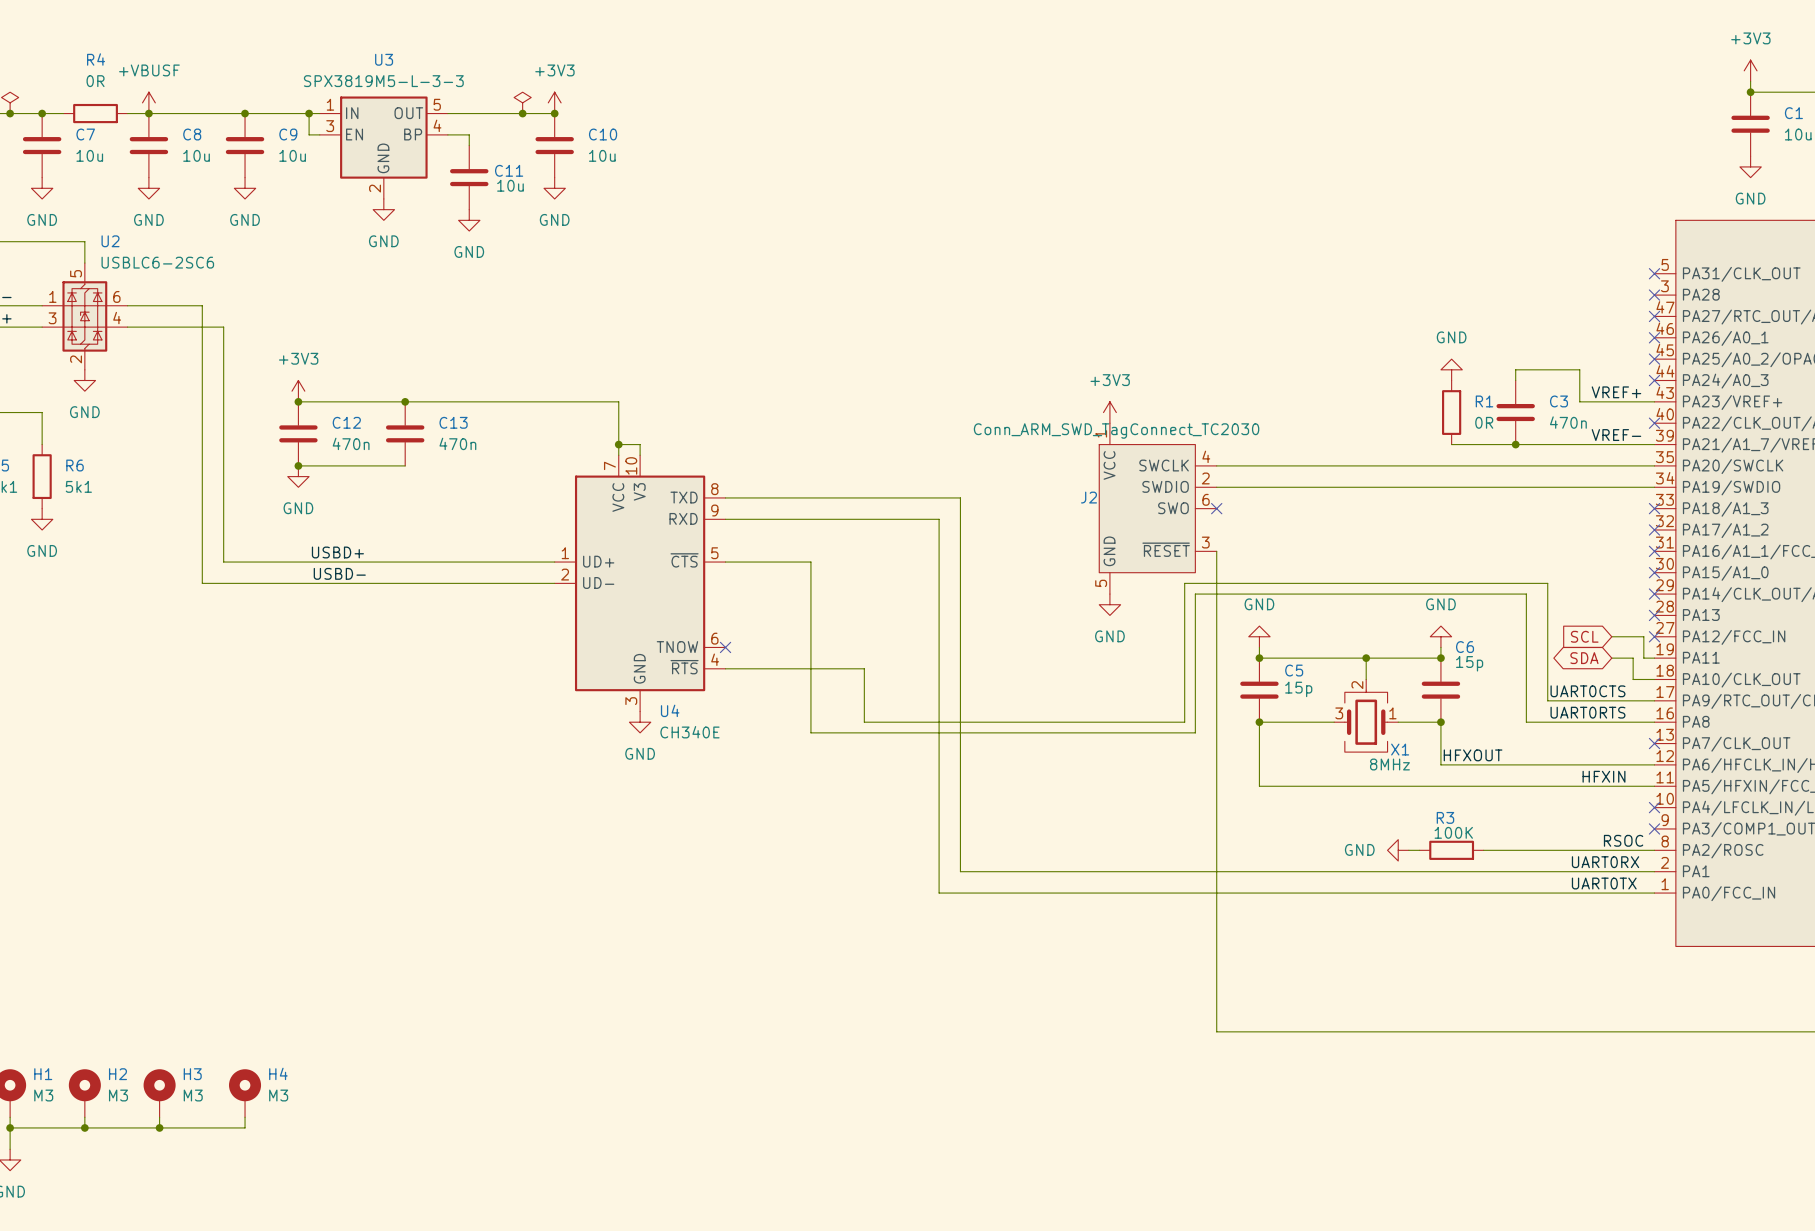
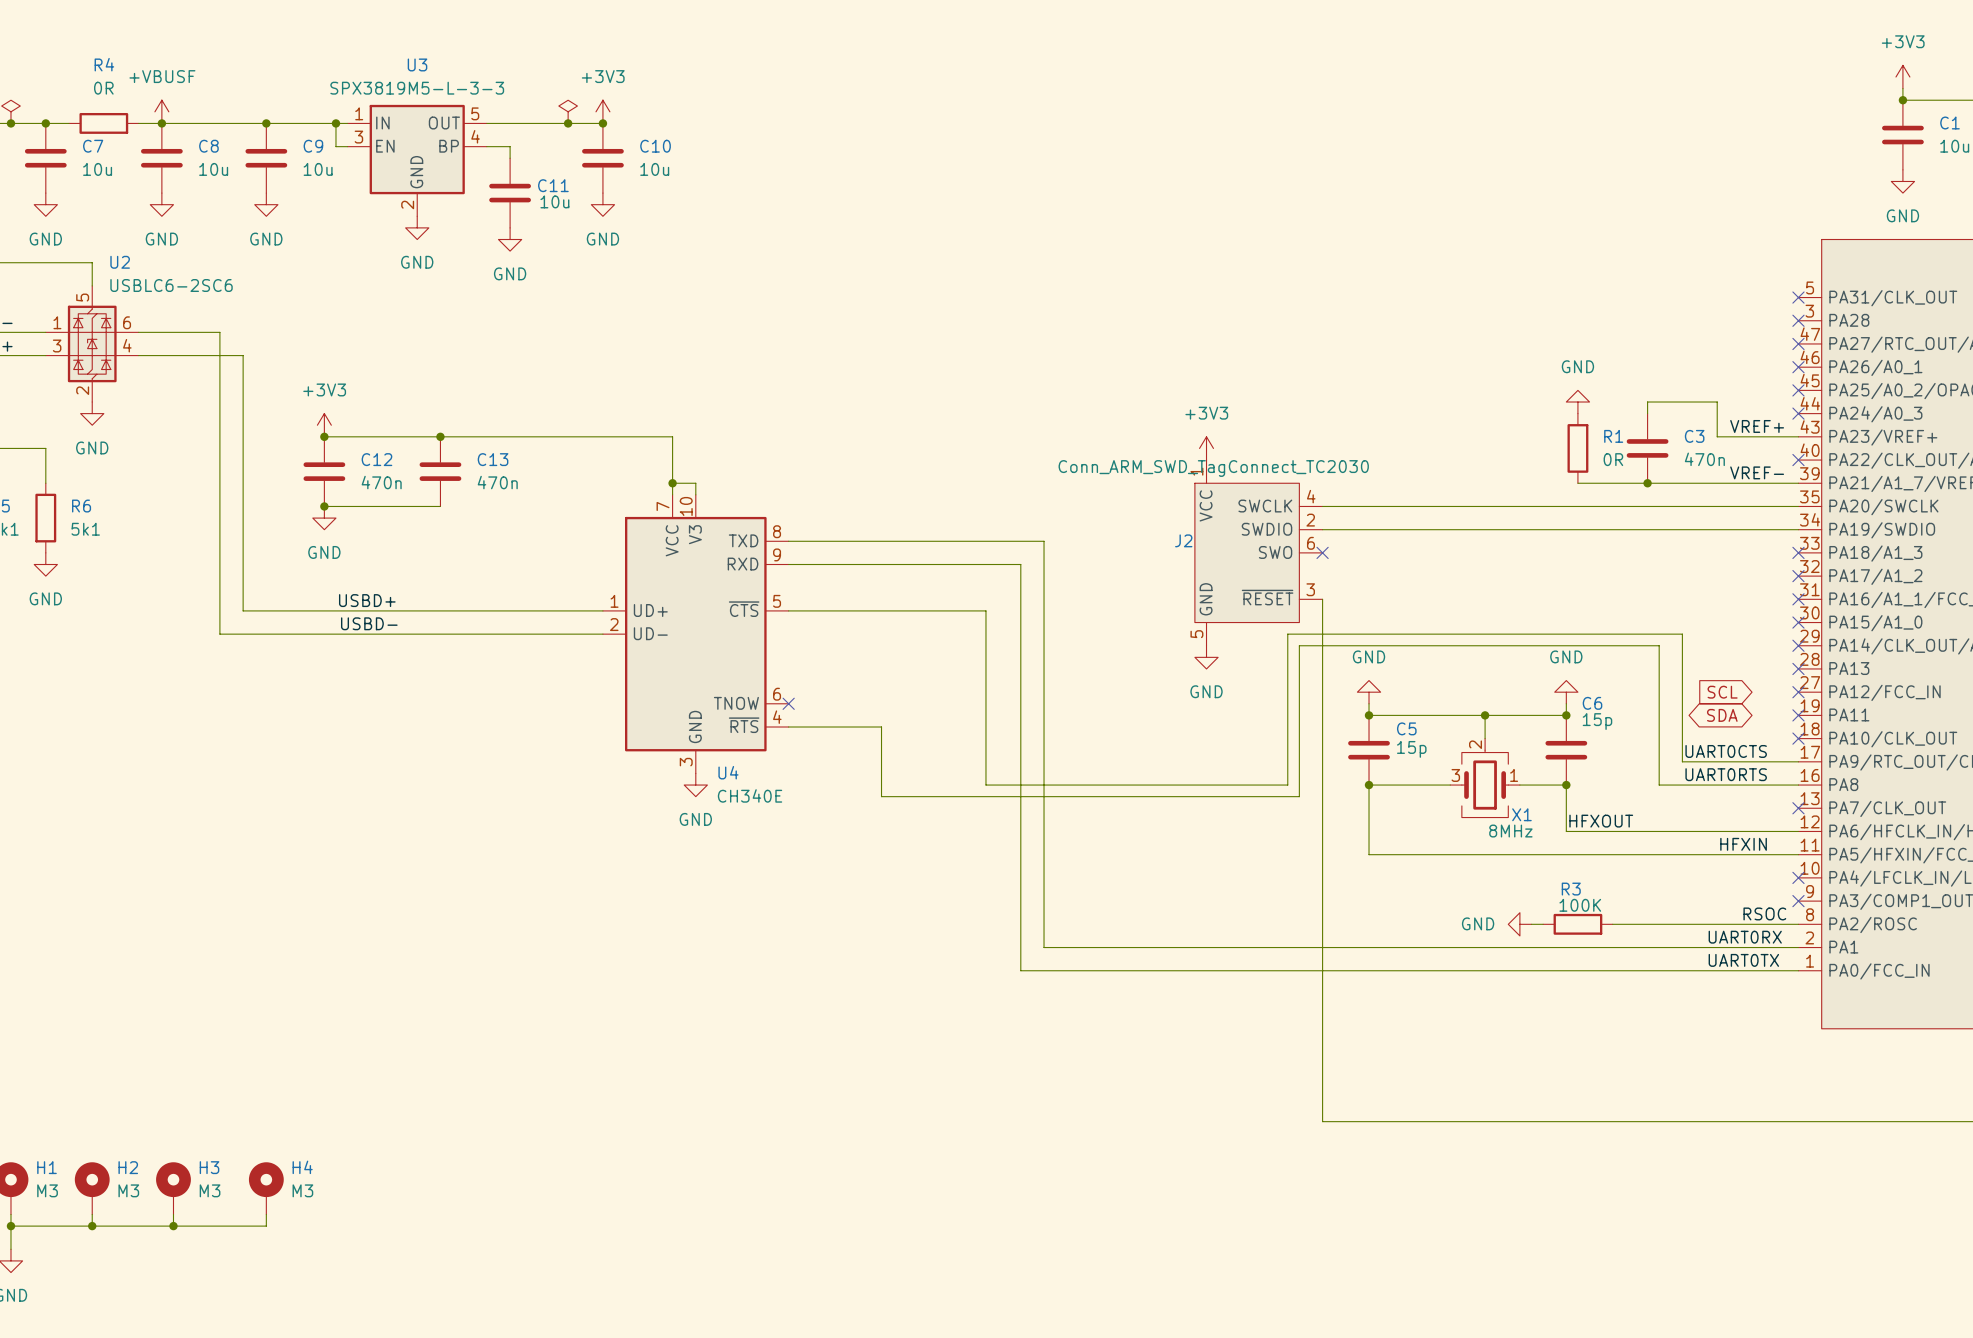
wire: (810, 562) (810, 668) (864, 668) (864, 722) (907, 722) -> (881, 610) (985, 610) (985, 785)
wire: (1611, 636) (1643, 636) (1643, 658) (1654, 658) -> none
wire: (1611, 658) (1633, 658) (1633, 679) (1654, 679) -> none
no-connect mark: none -> (1798, 715)
no-connect mark: none -> (1798, 738)

